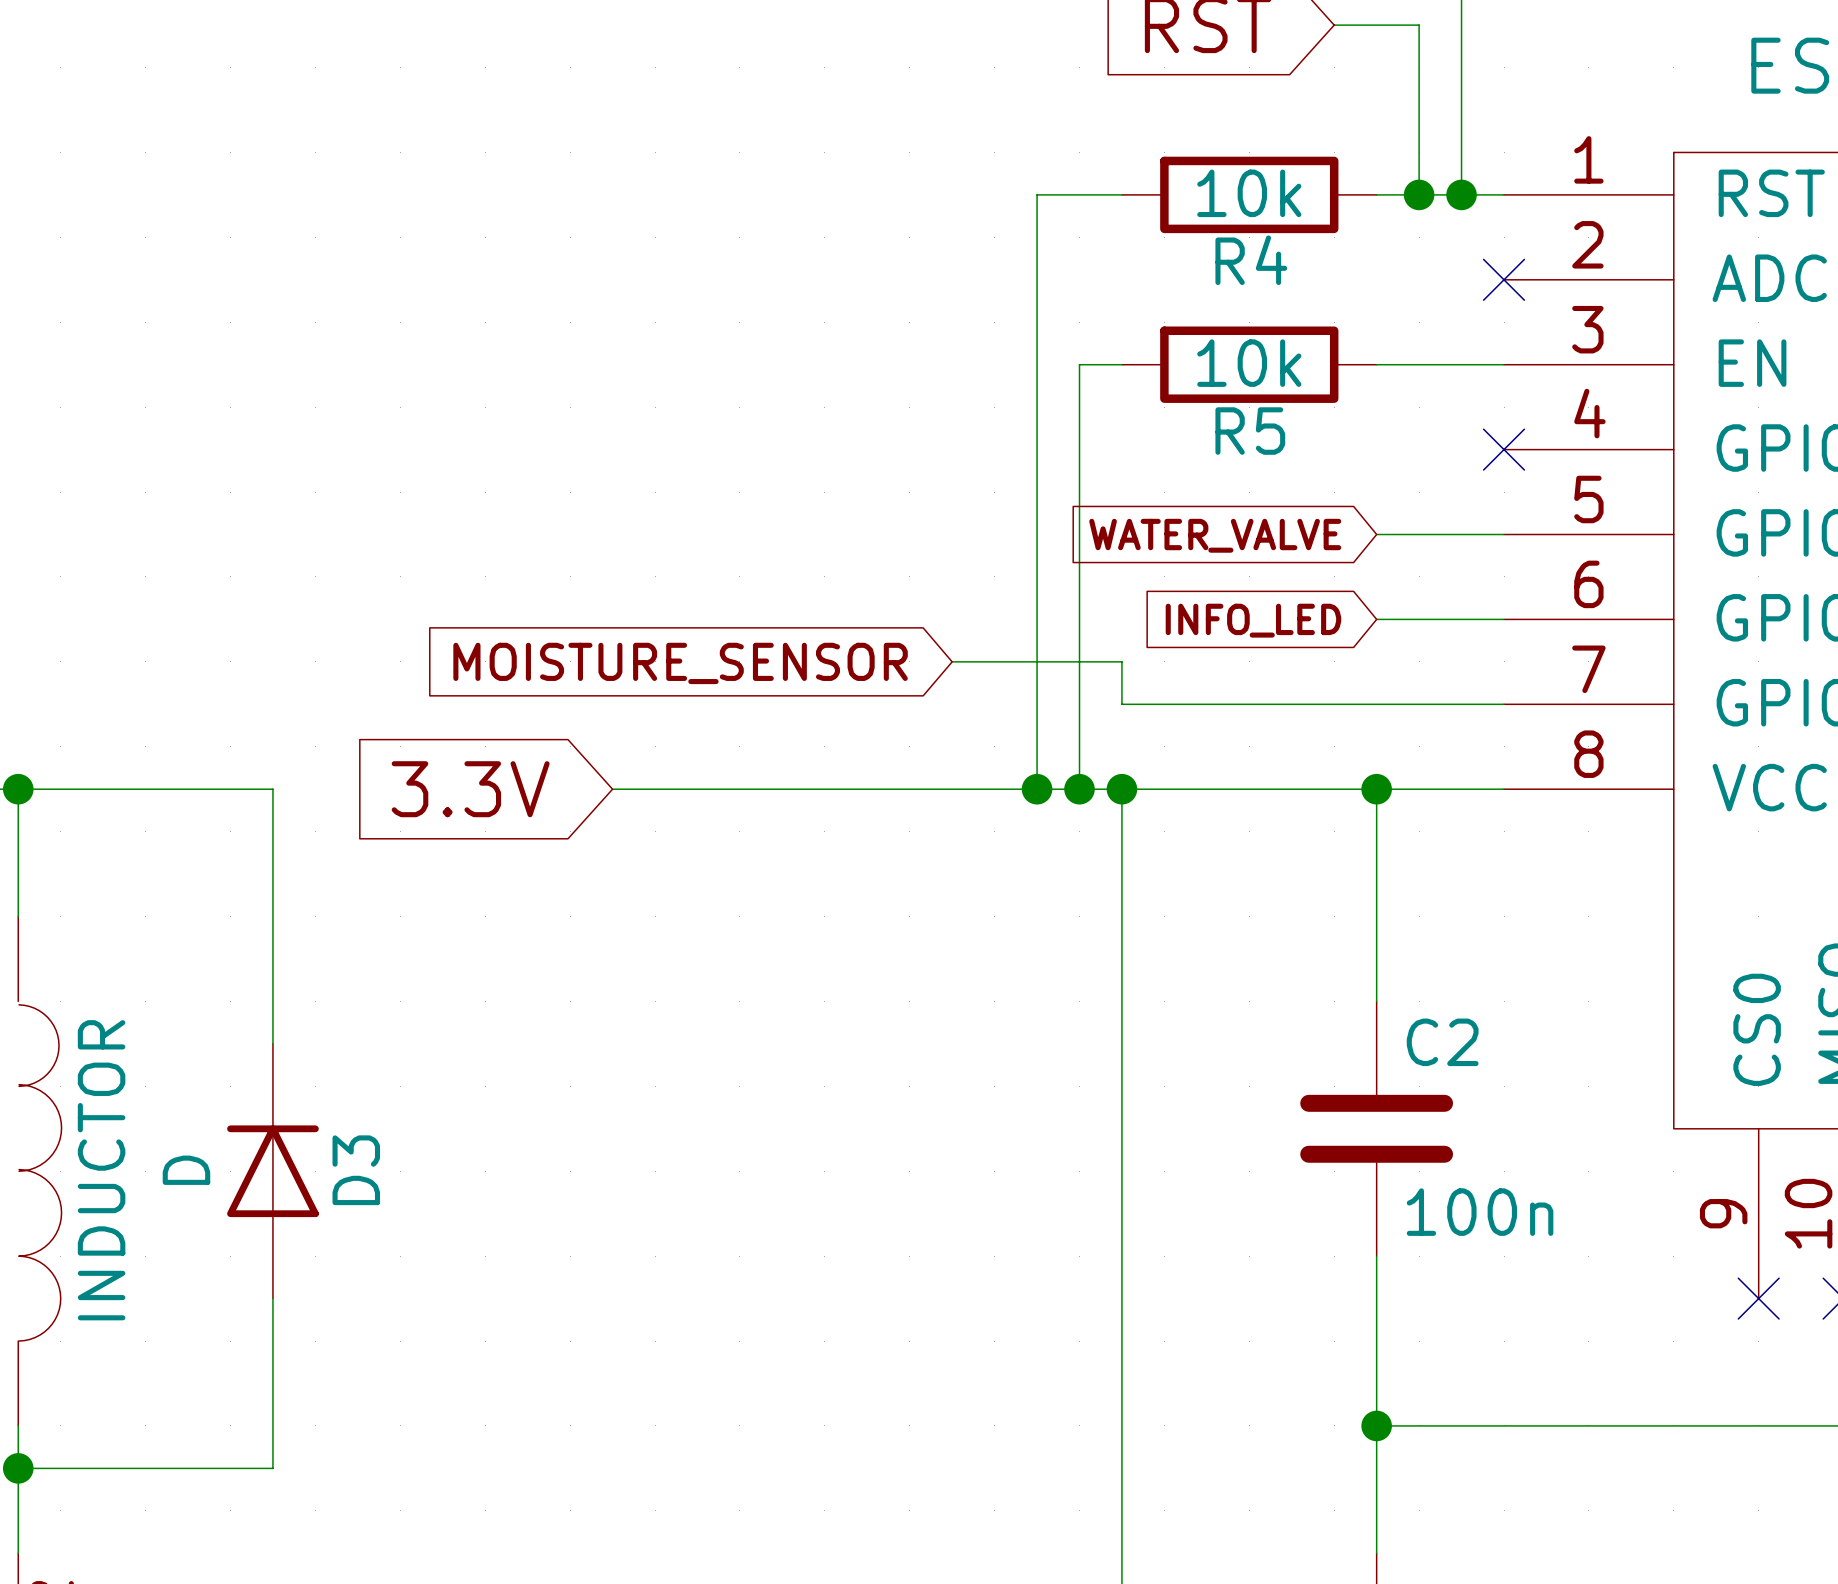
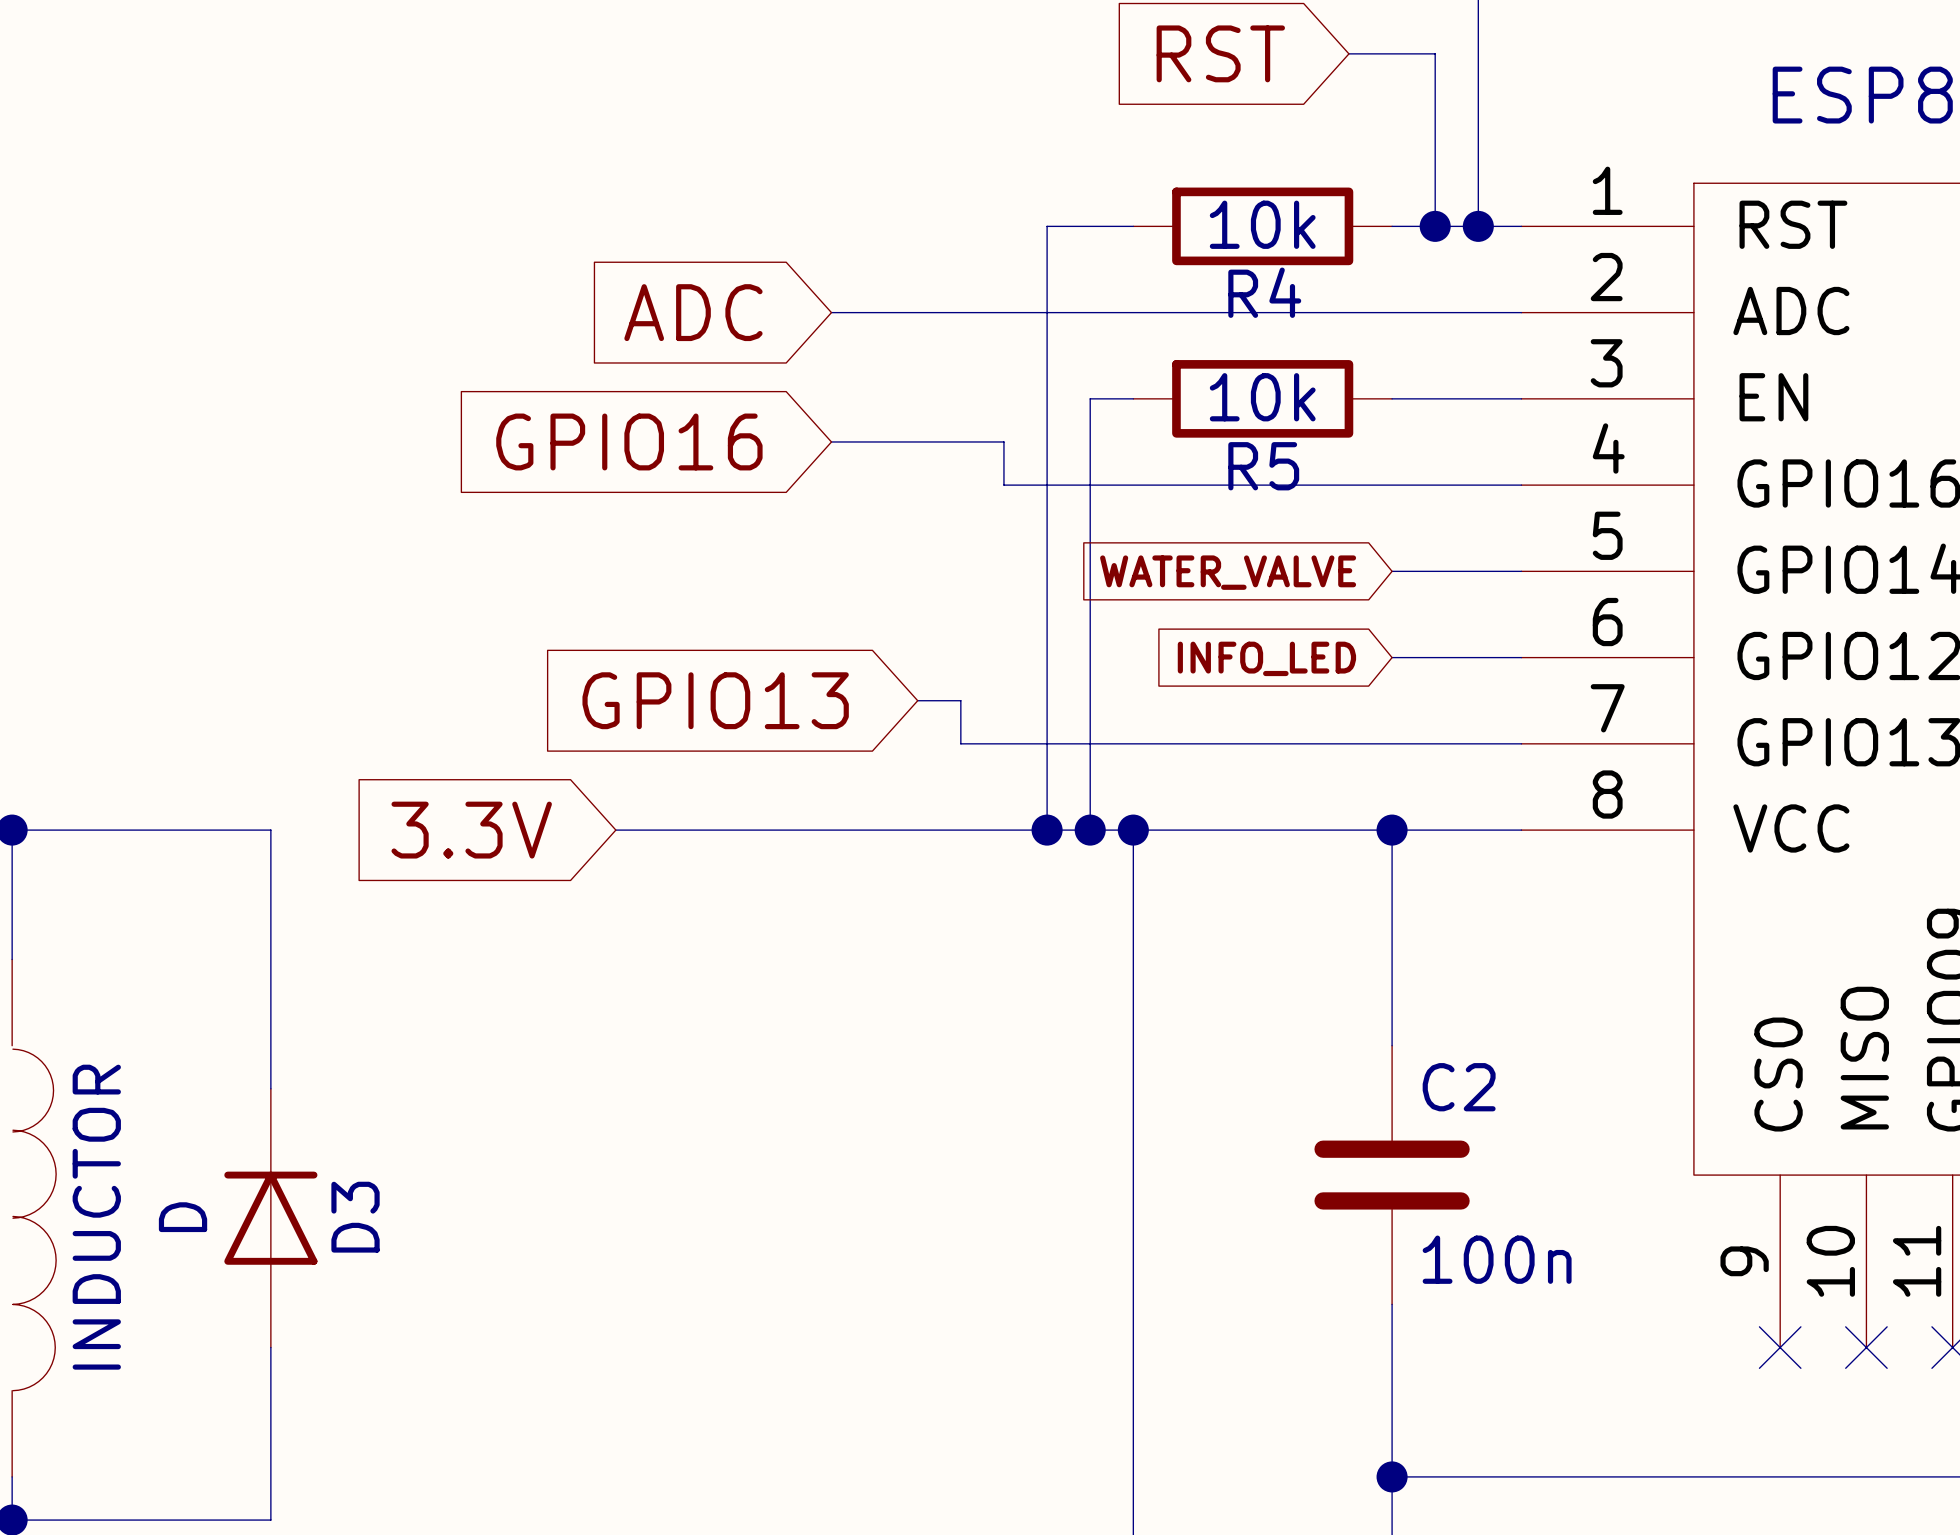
global label: none -> ADC (693, 312)
wire: none -> (831, 312) (1521, 312)
no-connect mark: (1504, 279) -> none
global label: none -> GPIO16 (629, 441)
wire: none -> (831, 441) (1003, 441) (1003, 485) (1521, 485)
no-connect mark: (1504, 449) -> none
global label: none -> GPIO13 (715, 700)
wire: (952, 661) (1121, 661) (1121, 704) -> (917, 700) (960, 700) (960, 743) (1133, 743)
global label: MOISTURE_SENSOR (680, 663) -> none

